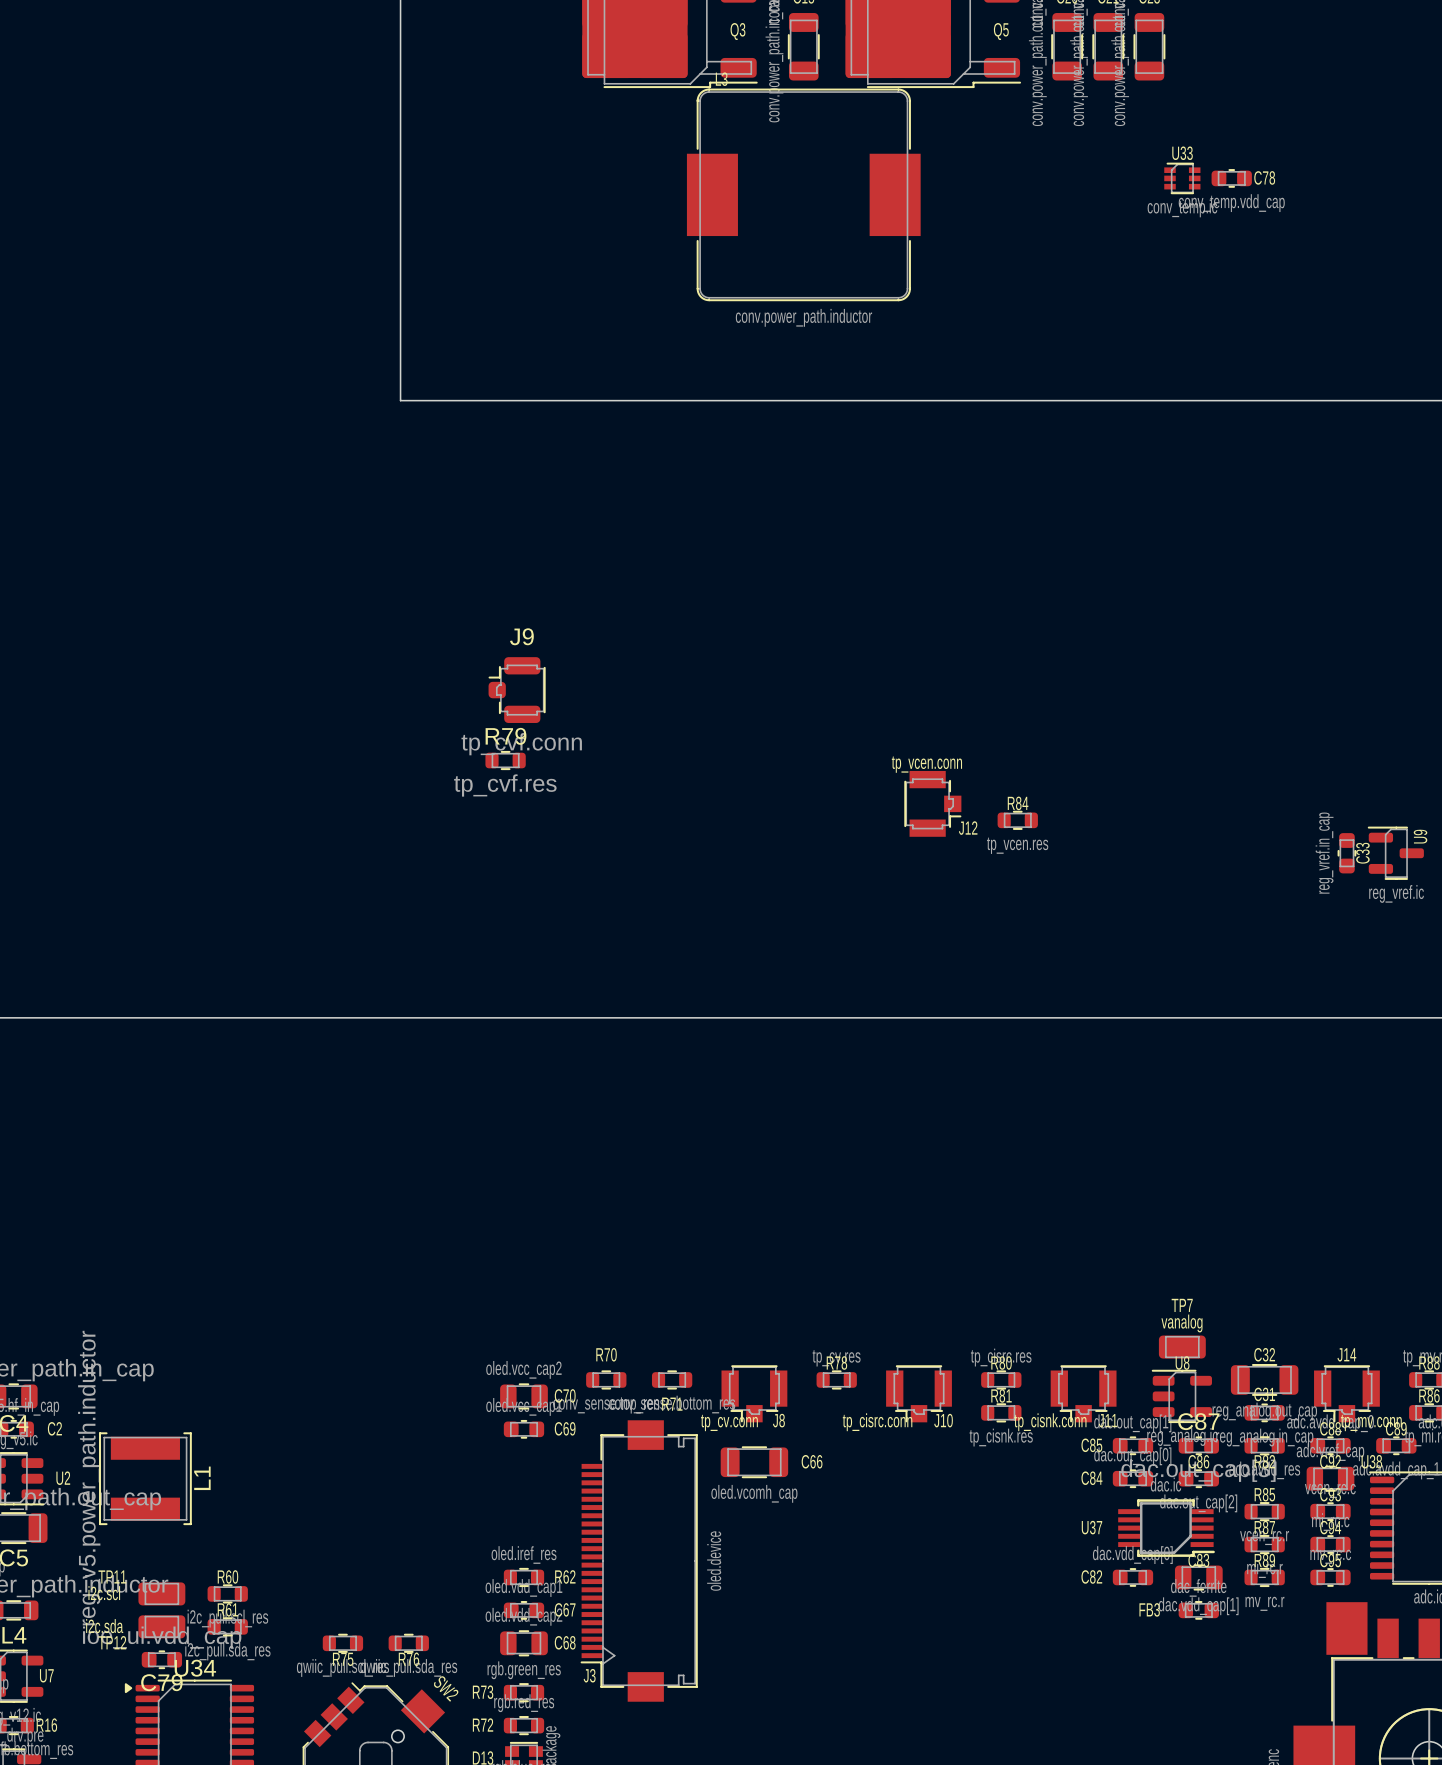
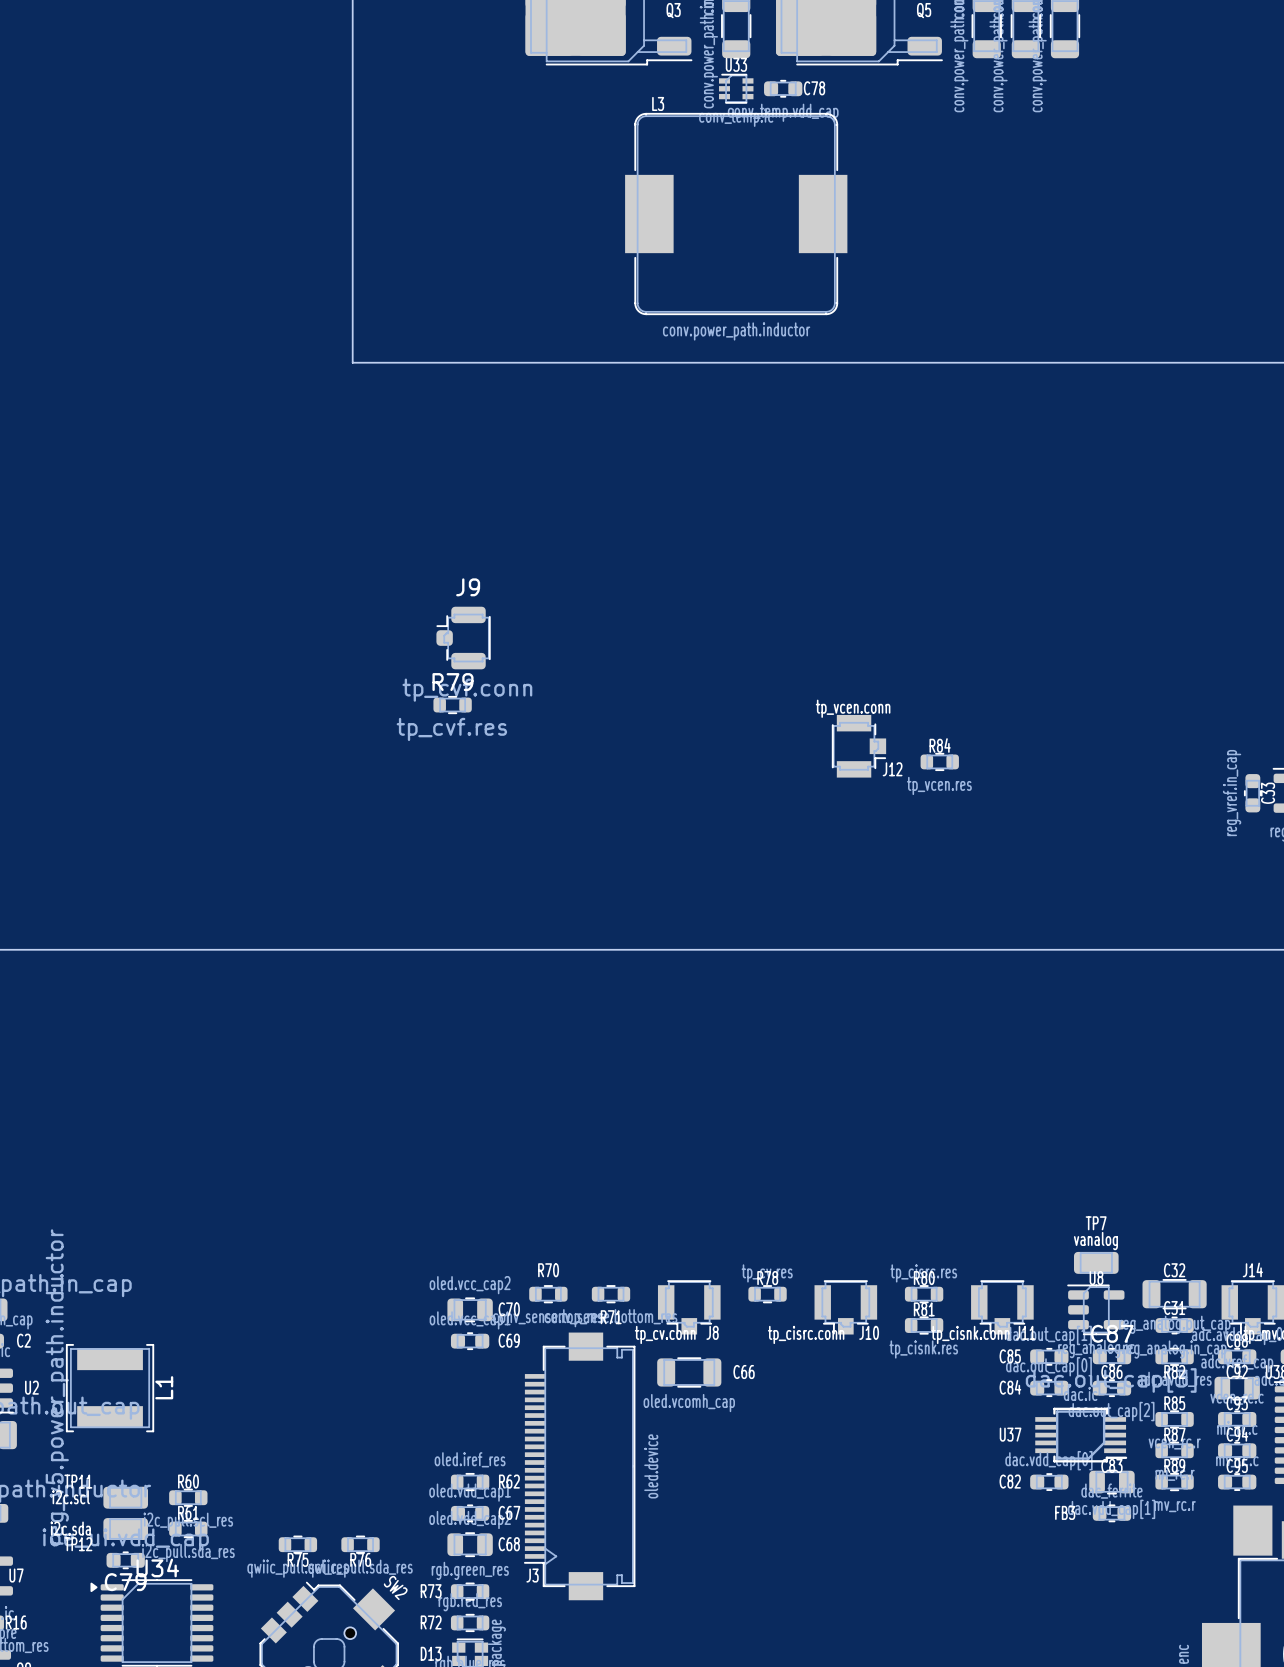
U33 position: (1182, 178) -> (736, 88)
C78 position: (1231, 178) -> (783, 88)
L3 position: (803, 194) -> (736, 214)

